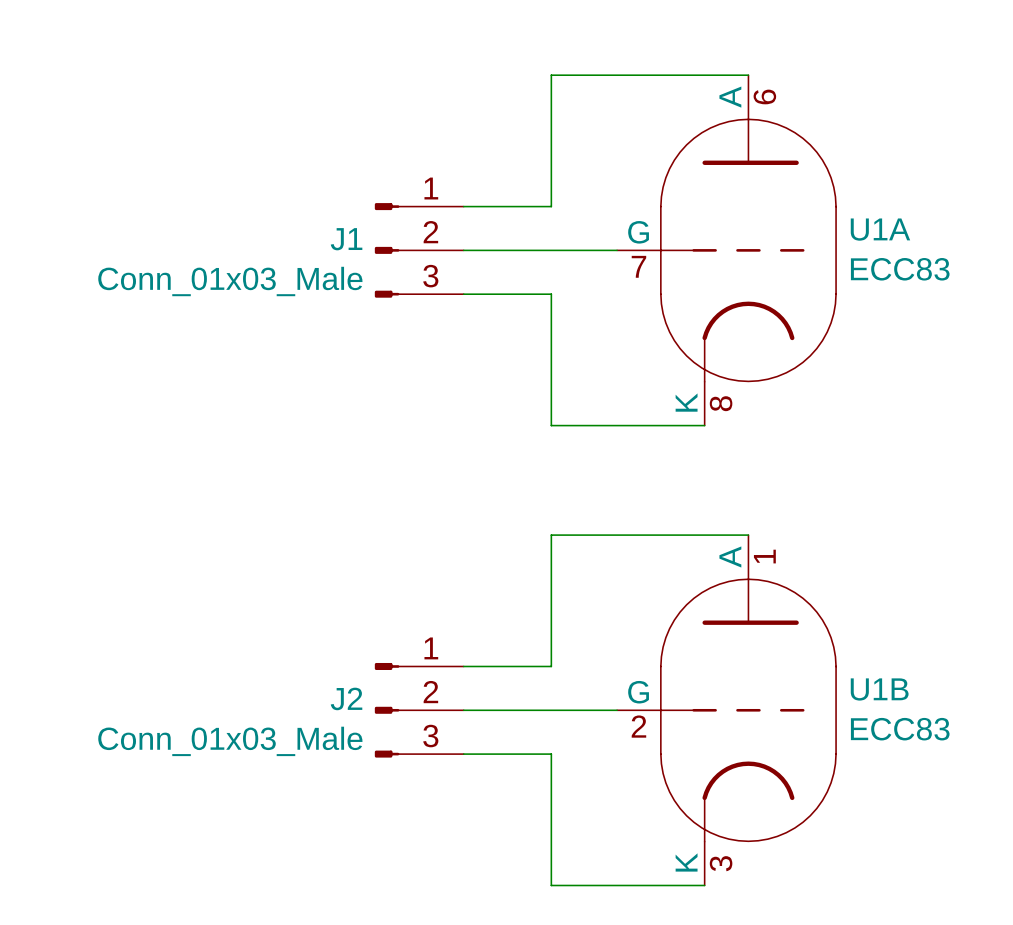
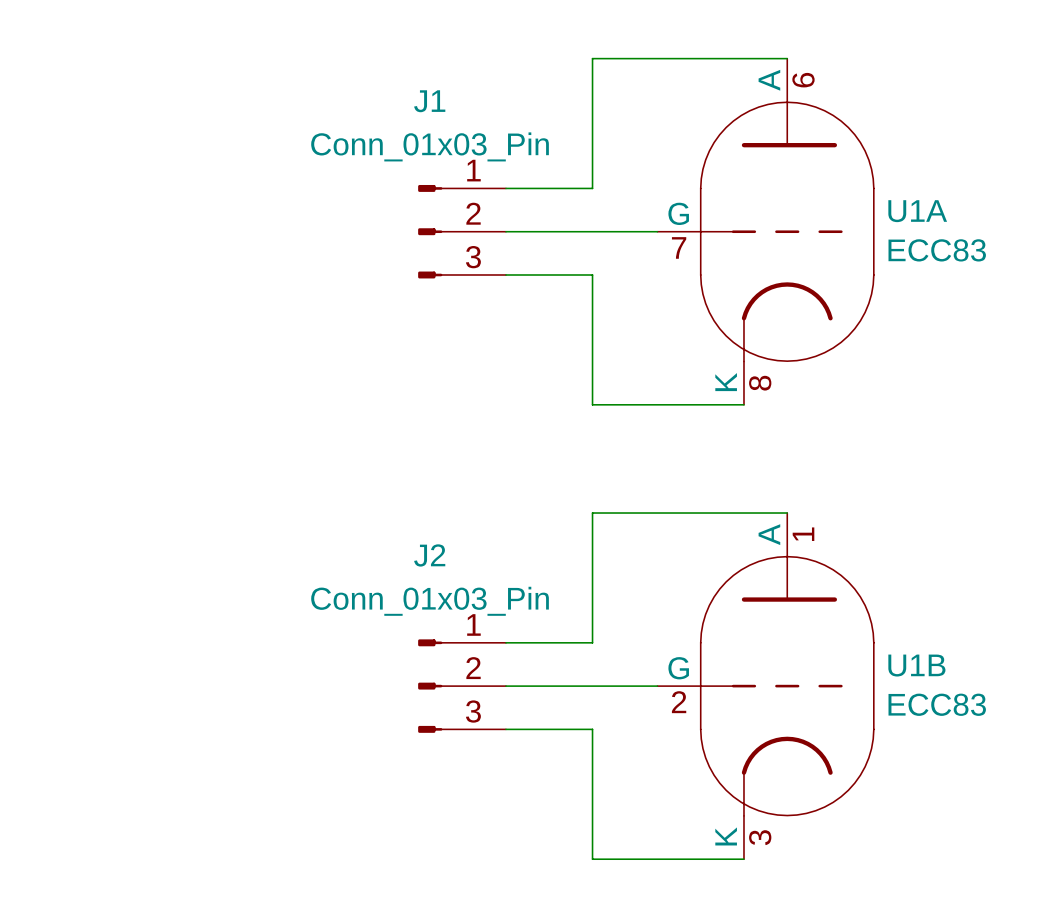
J1 name position: J1 (346, 239) -> J1 (429, 101)
J1 value: Conn_01x03_Male (230, 281) -> Conn_01x03_Pin (430, 146)
J2 name position: J2 (346, 698) -> J2 (429, 555)
J2 value: Conn_01x03_Male (230, 741) -> Conn_01x03_Pin (430, 601)

